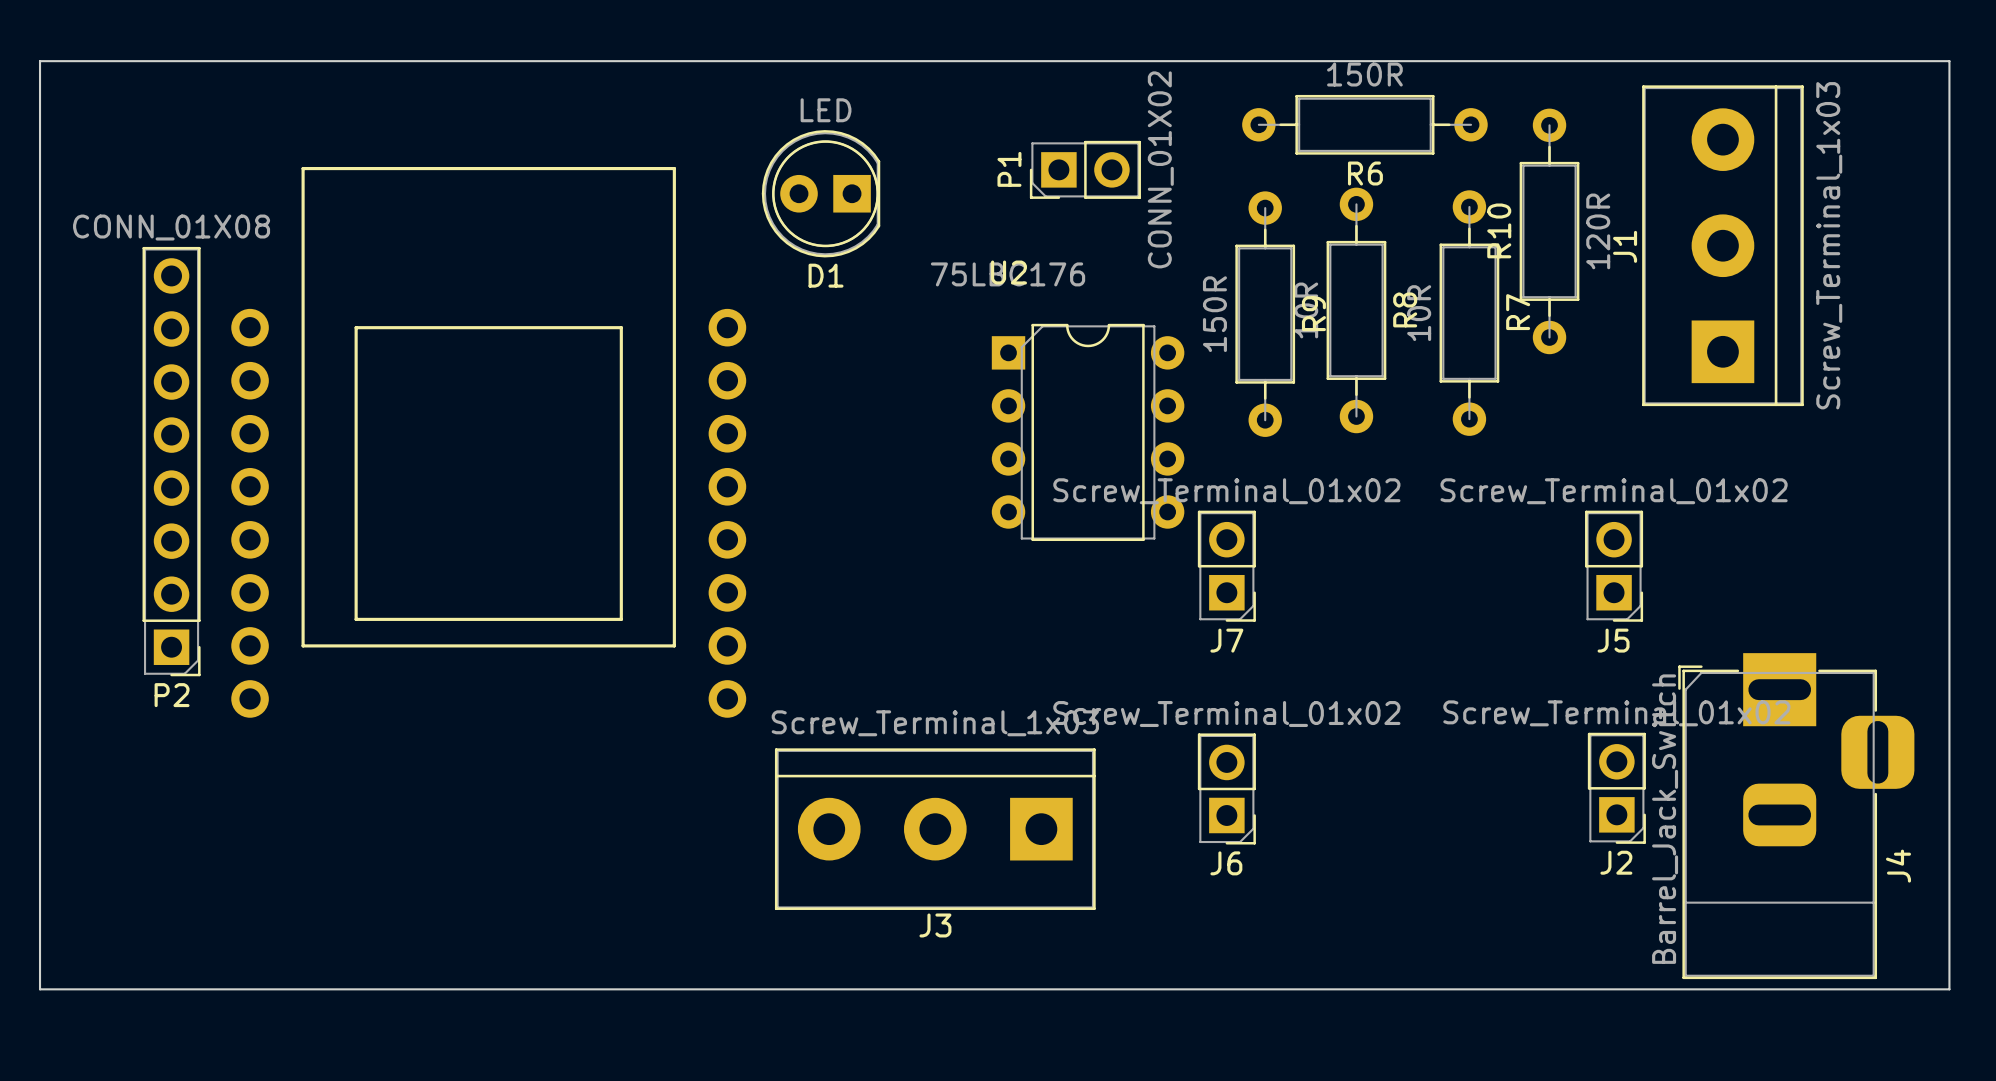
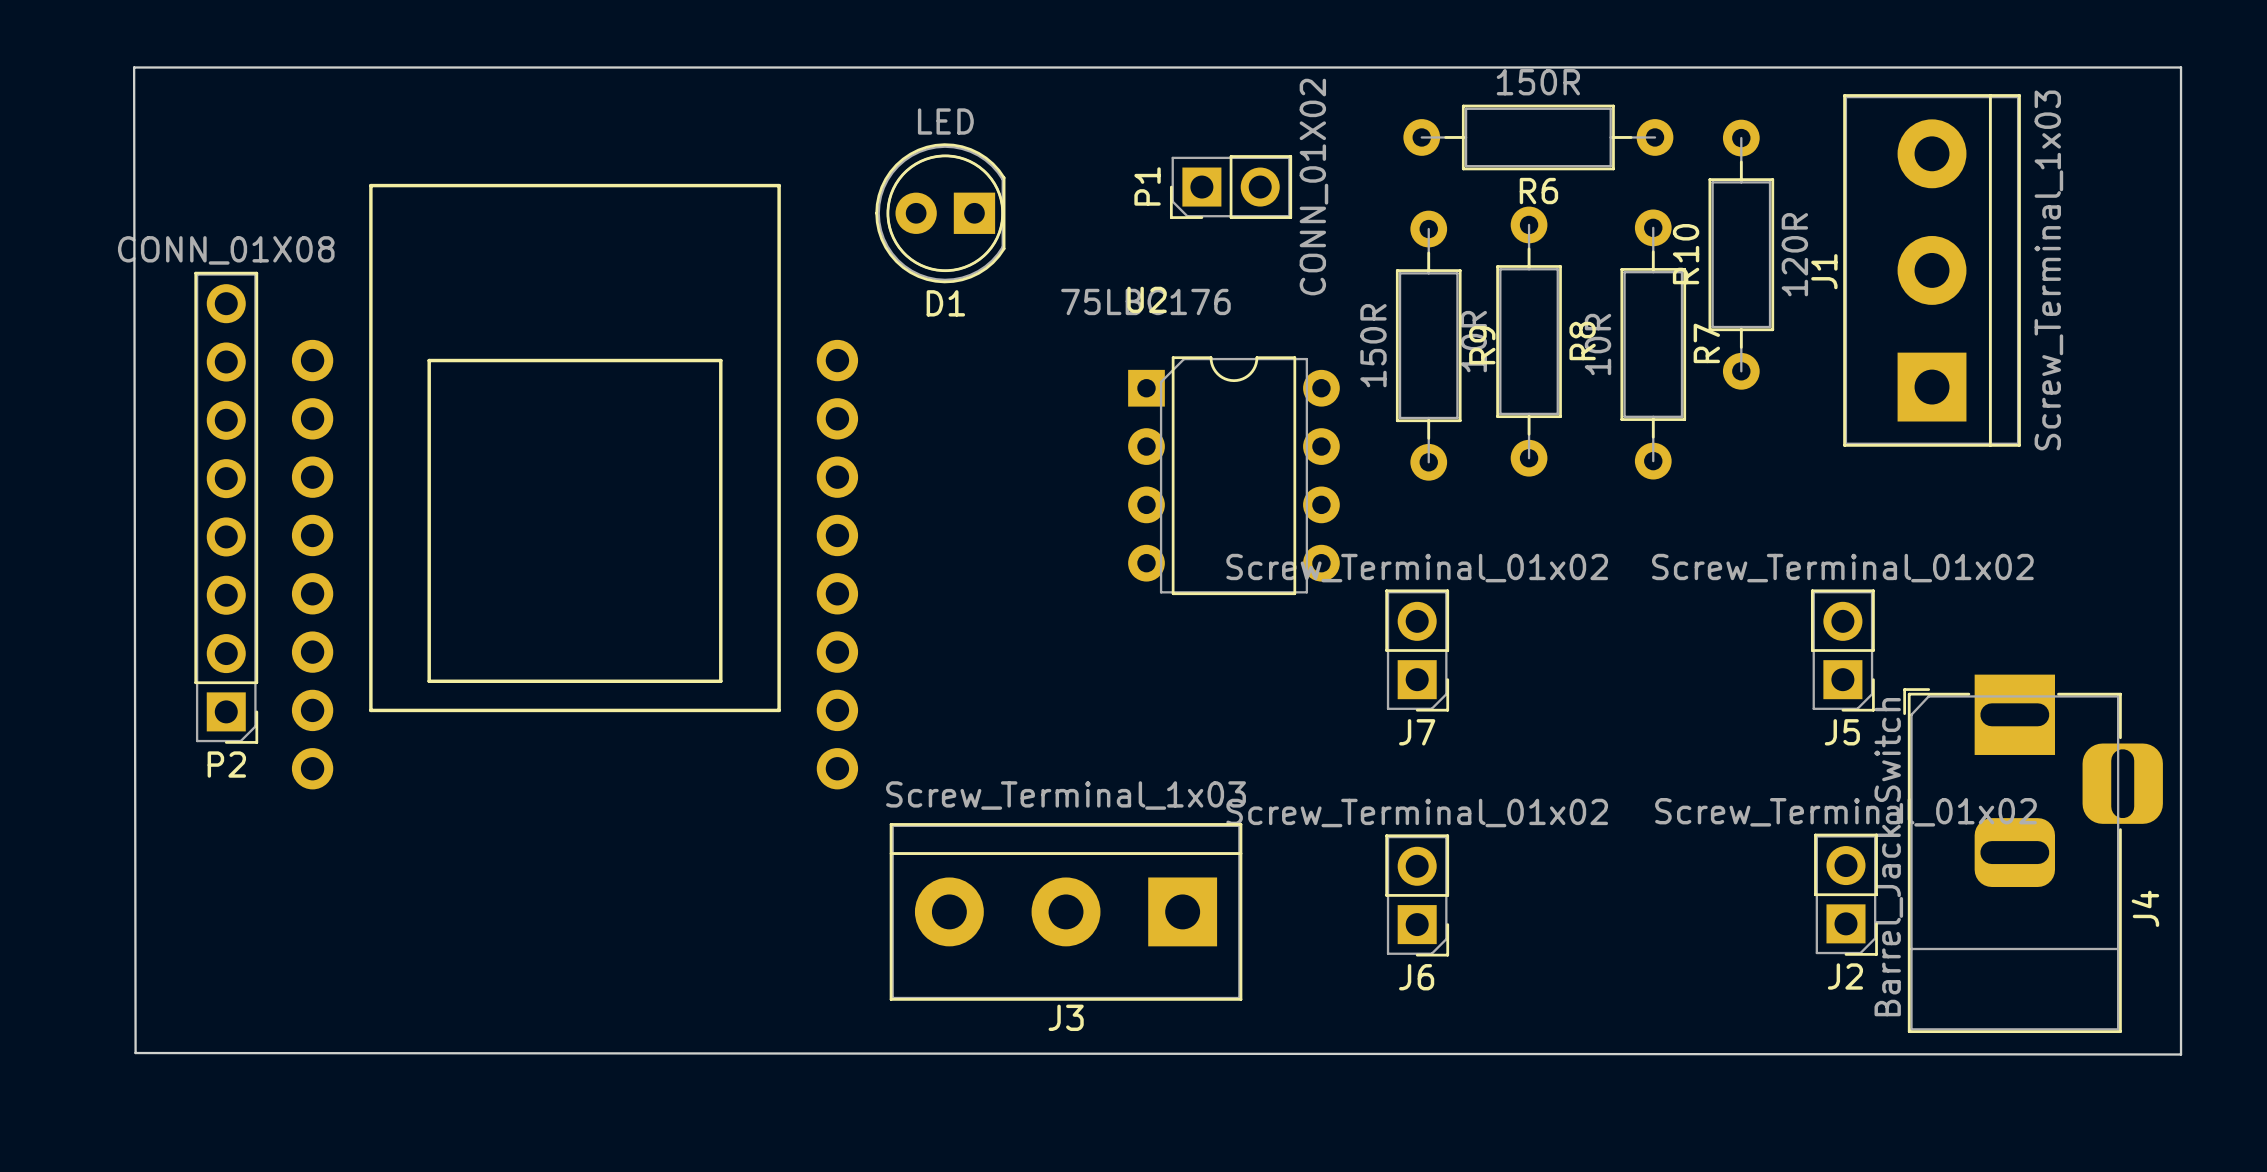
board edge: (87, 61) (40, 61) (40, 989) (1949, 989) (1949, 958) -> (134, 67) (135, 1053) (2181, 1054)
J7 position: (1226, 566) -> (1417, 650)
J5 position: (1614, 566) -> (1842, 650)
J6 position: (1226, 788) -> (1417, 895)
J2 position: (1616, 788) -> (1846, 894)
J4 position: (1796, 816) -> (2033, 853)

